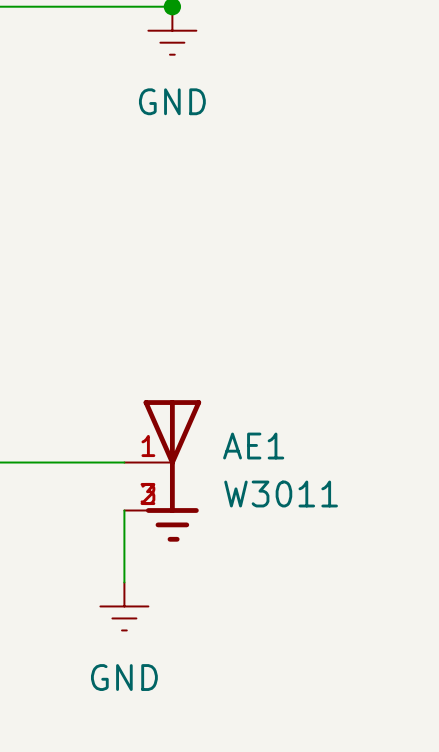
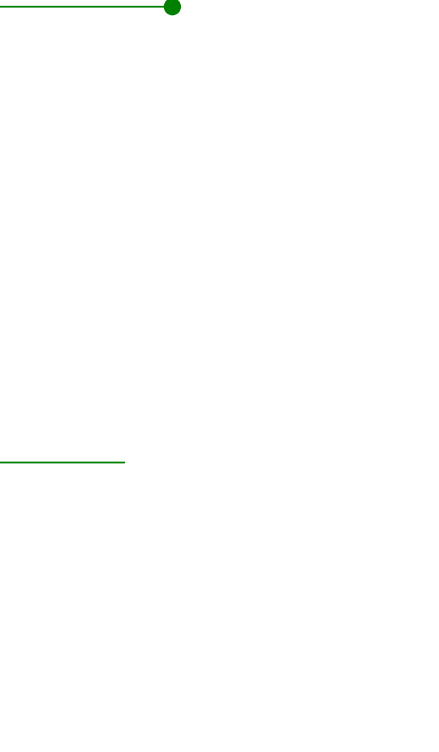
power symbol: GND (172, 30) -> none
AE1: W3011 (162, 470) -> none
wire: (124, 510) (124, 582) -> none
power symbol: GND (124, 606) -> none

